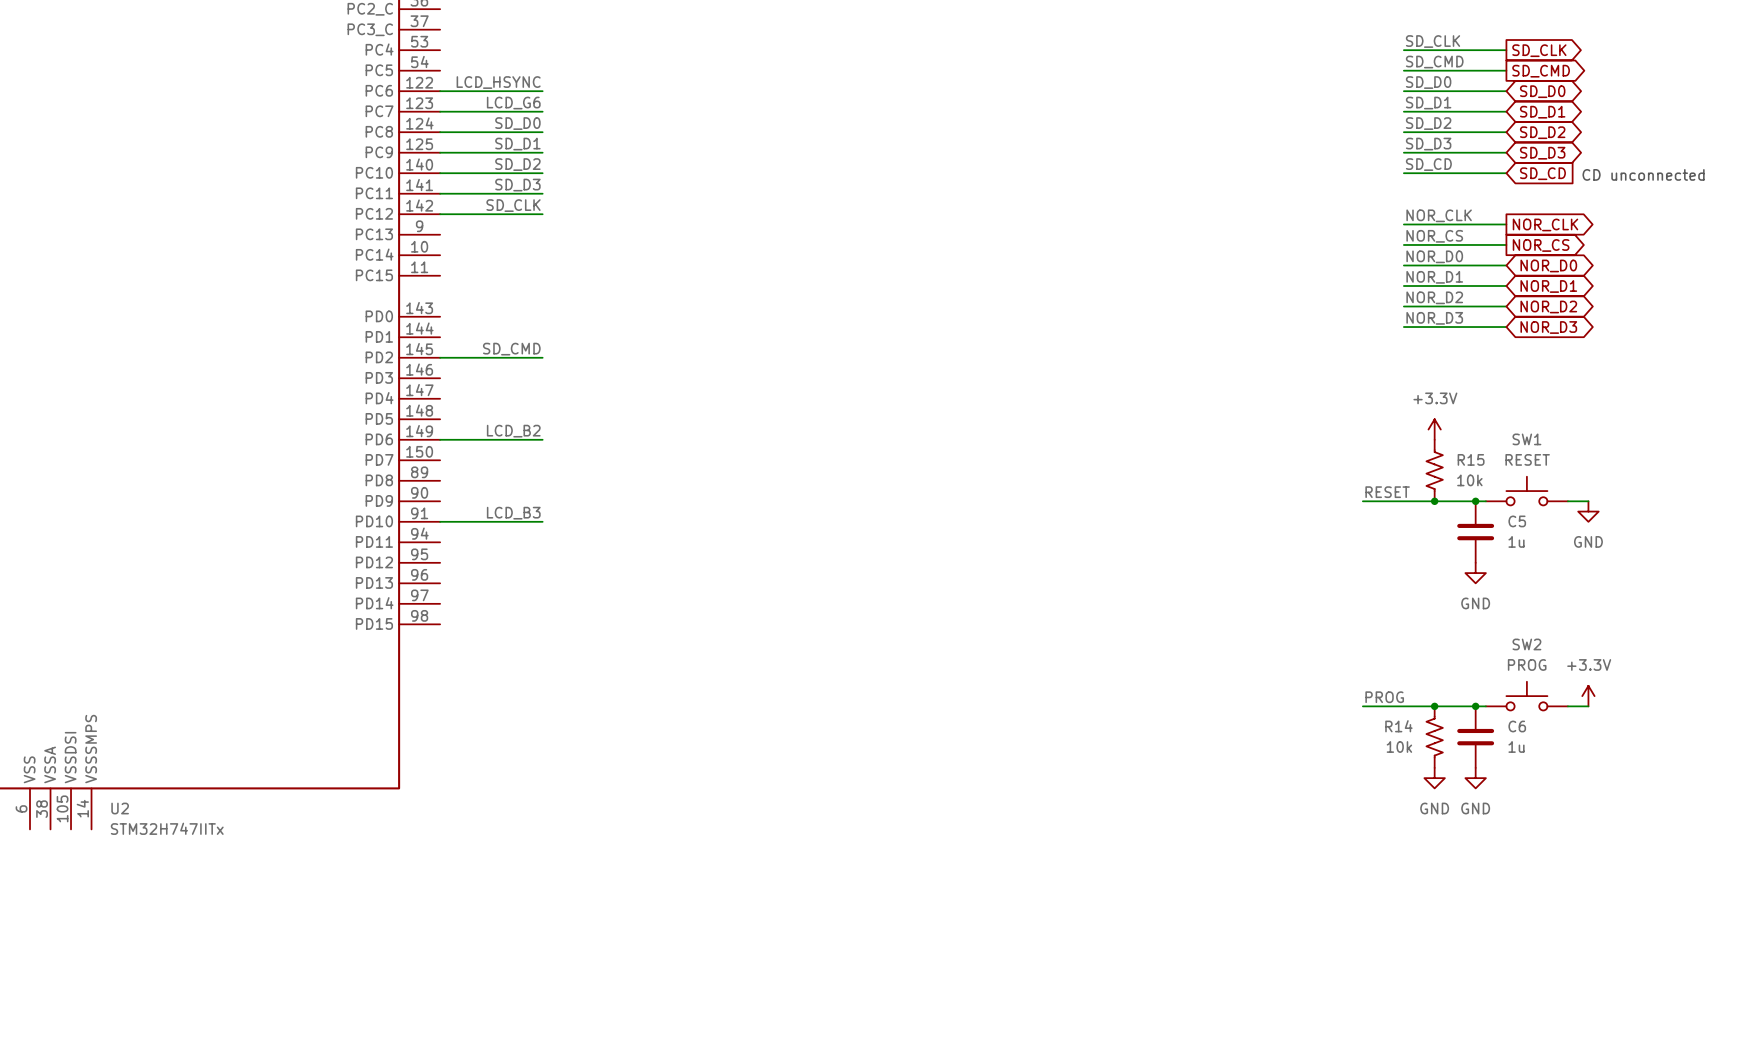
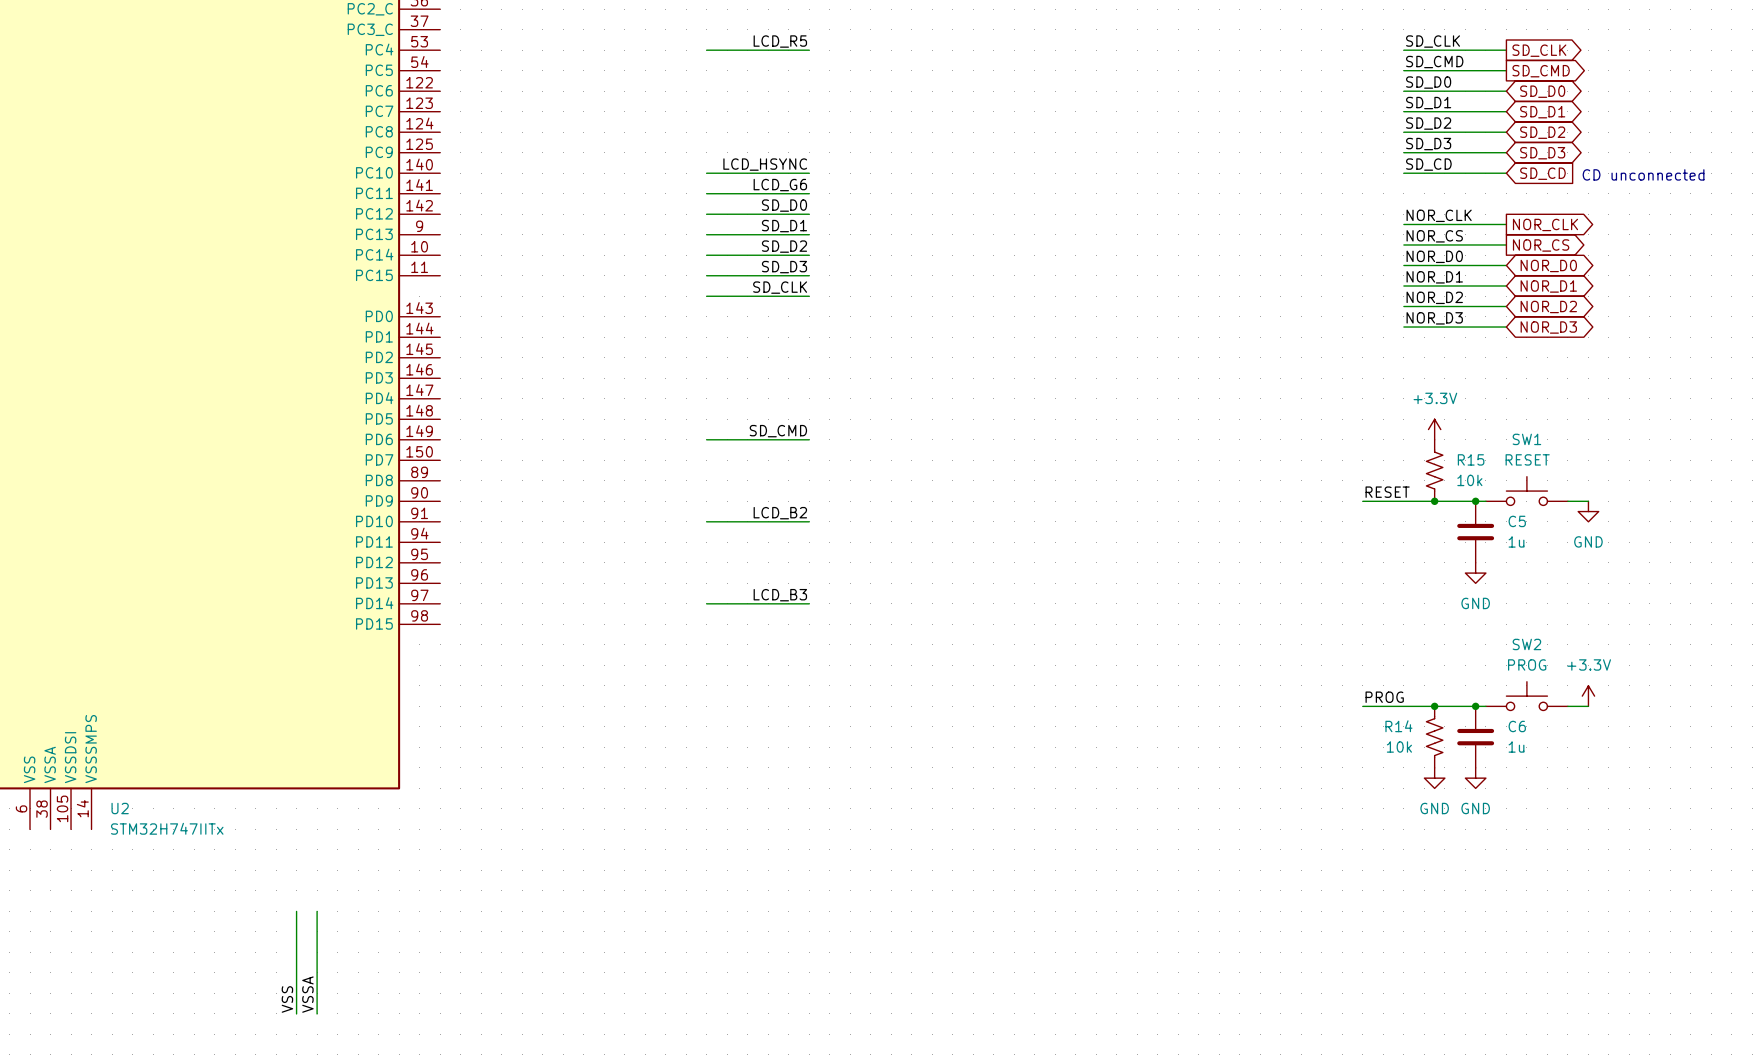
label: none -> LCD_R5 (780, 41)
wire: none -> (706, 50) (809, 50)
label: LCD_HSYNC (498, 82) -> none
wire: (440, 91) (542, 91) -> none
label: LCD_G6 (513, 103) -> none
wire: (440, 111) (542, 111) -> none
label: SD_D0 (517, 123) -> none
wire: (440, 132) (542, 132) -> none
label: SD_D1 (517, 144) -> none
wire: (440, 152) (542, 152) -> none
label: SD_D2 (517, 164) -> none
label: none -> LCD_HSYNC (765, 164)
wire: (440, 173) (542, 173) -> none
wire: none -> (706, 173) (809, 173)
label: SD_D3 (517, 185) -> none
label: none -> LCD_G6 (780, 185)
wire: (440, 193) (542, 193) -> none
wire: none -> (706, 193) (809, 193)
label: SD_CLK (513, 205) -> none
label: none -> SD_D0 (784, 205)
wire: (440, 214) (542, 214) -> none
wire: none -> (706, 214) (809, 214)
label: none -> SD_D1 (784, 226)
wire: none -> (706, 234) (809, 234)
label: none -> SD_D2 (784, 246)
wire: none -> (706, 255) (809, 255)
label: none -> SD_D3 (784, 267)
wire: none -> (706, 275) (809, 275)
label: none -> SD_CLK (780, 287)
wire: none -> (706, 296) (809, 296)
label: SD_CMD (511, 349) -> none
wire: (440, 357) (542, 357) -> none
label: LCD_B2 (513, 431) -> none
label: none -> SD_CMD (778, 431)
wire: (440, 439) (542, 439) -> none
wire: none -> (706, 439) (809, 439)
label: LCD_B3 (513, 513) -> none
label: none -> LCD_B2 (780, 513)
wire: (440, 521) (542, 521) -> none
wire: none -> (706, 521) (809, 521)
label: none -> LCD_B3 (780, 595)
wire: none -> (706, 603) (809, 603)
wire: none -> (296, 911) (296, 1013)
wire: none -> (317, 911) (317, 1013)
label: none -> VSSA (307, 994)
label: none -> VSS (287, 999)

